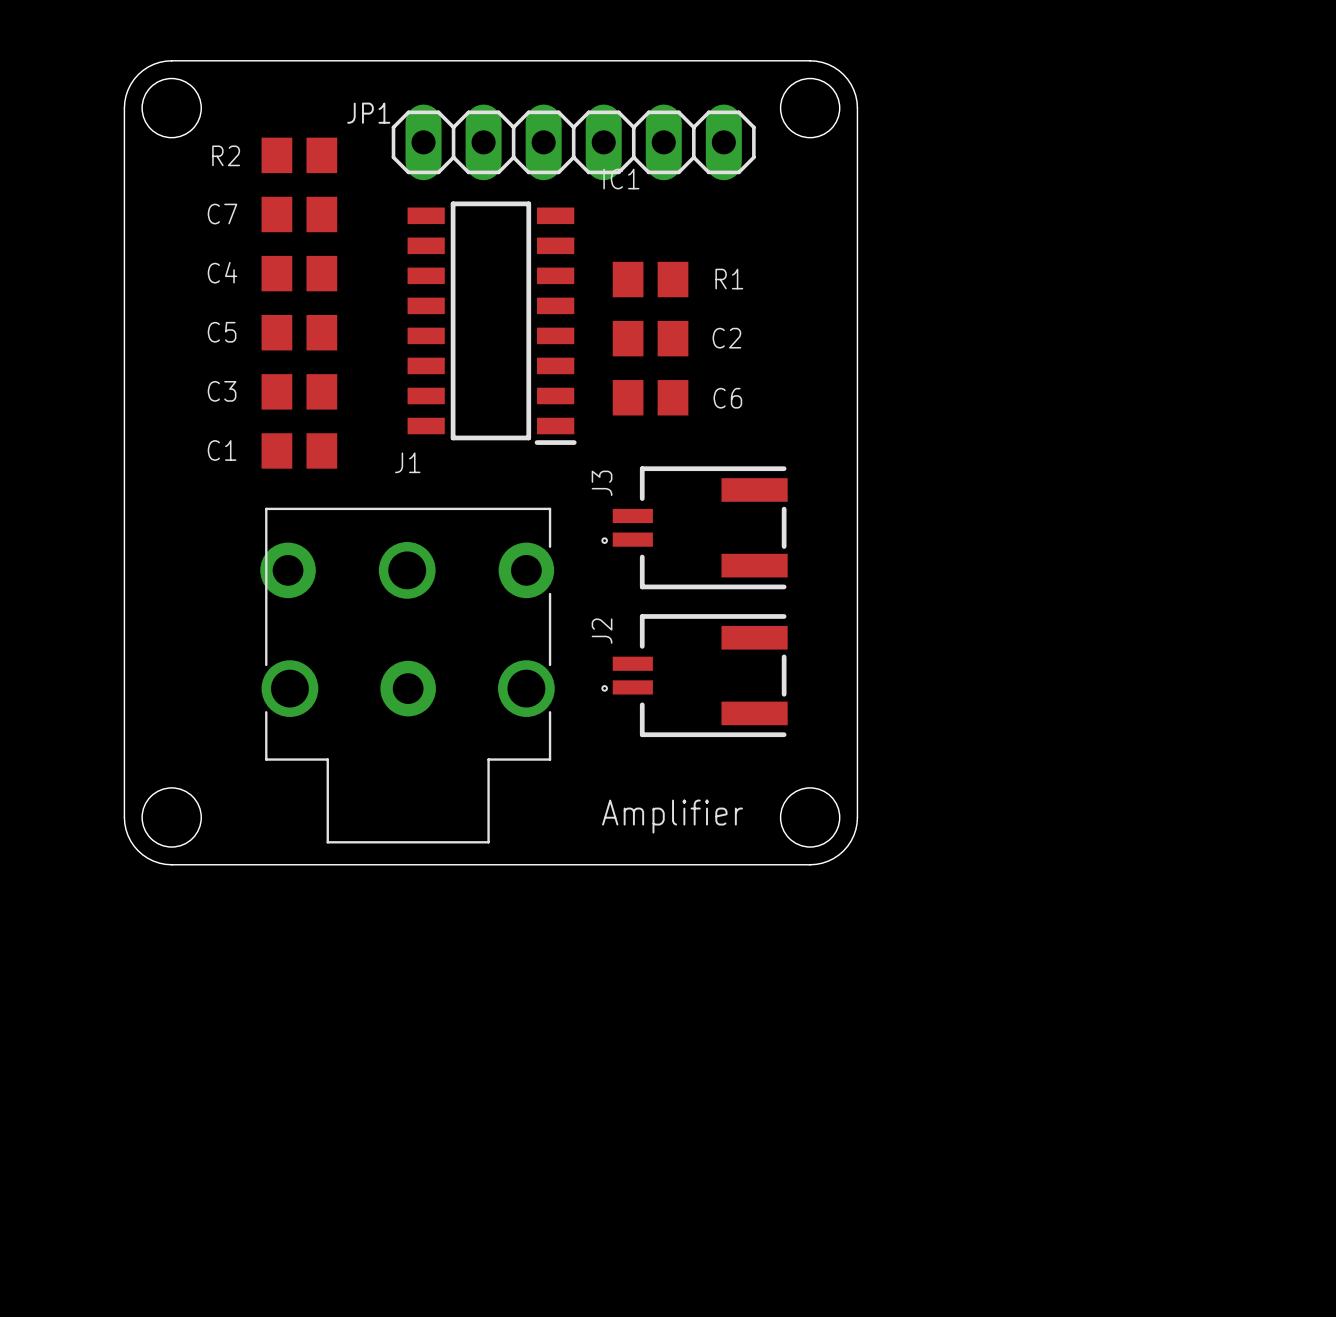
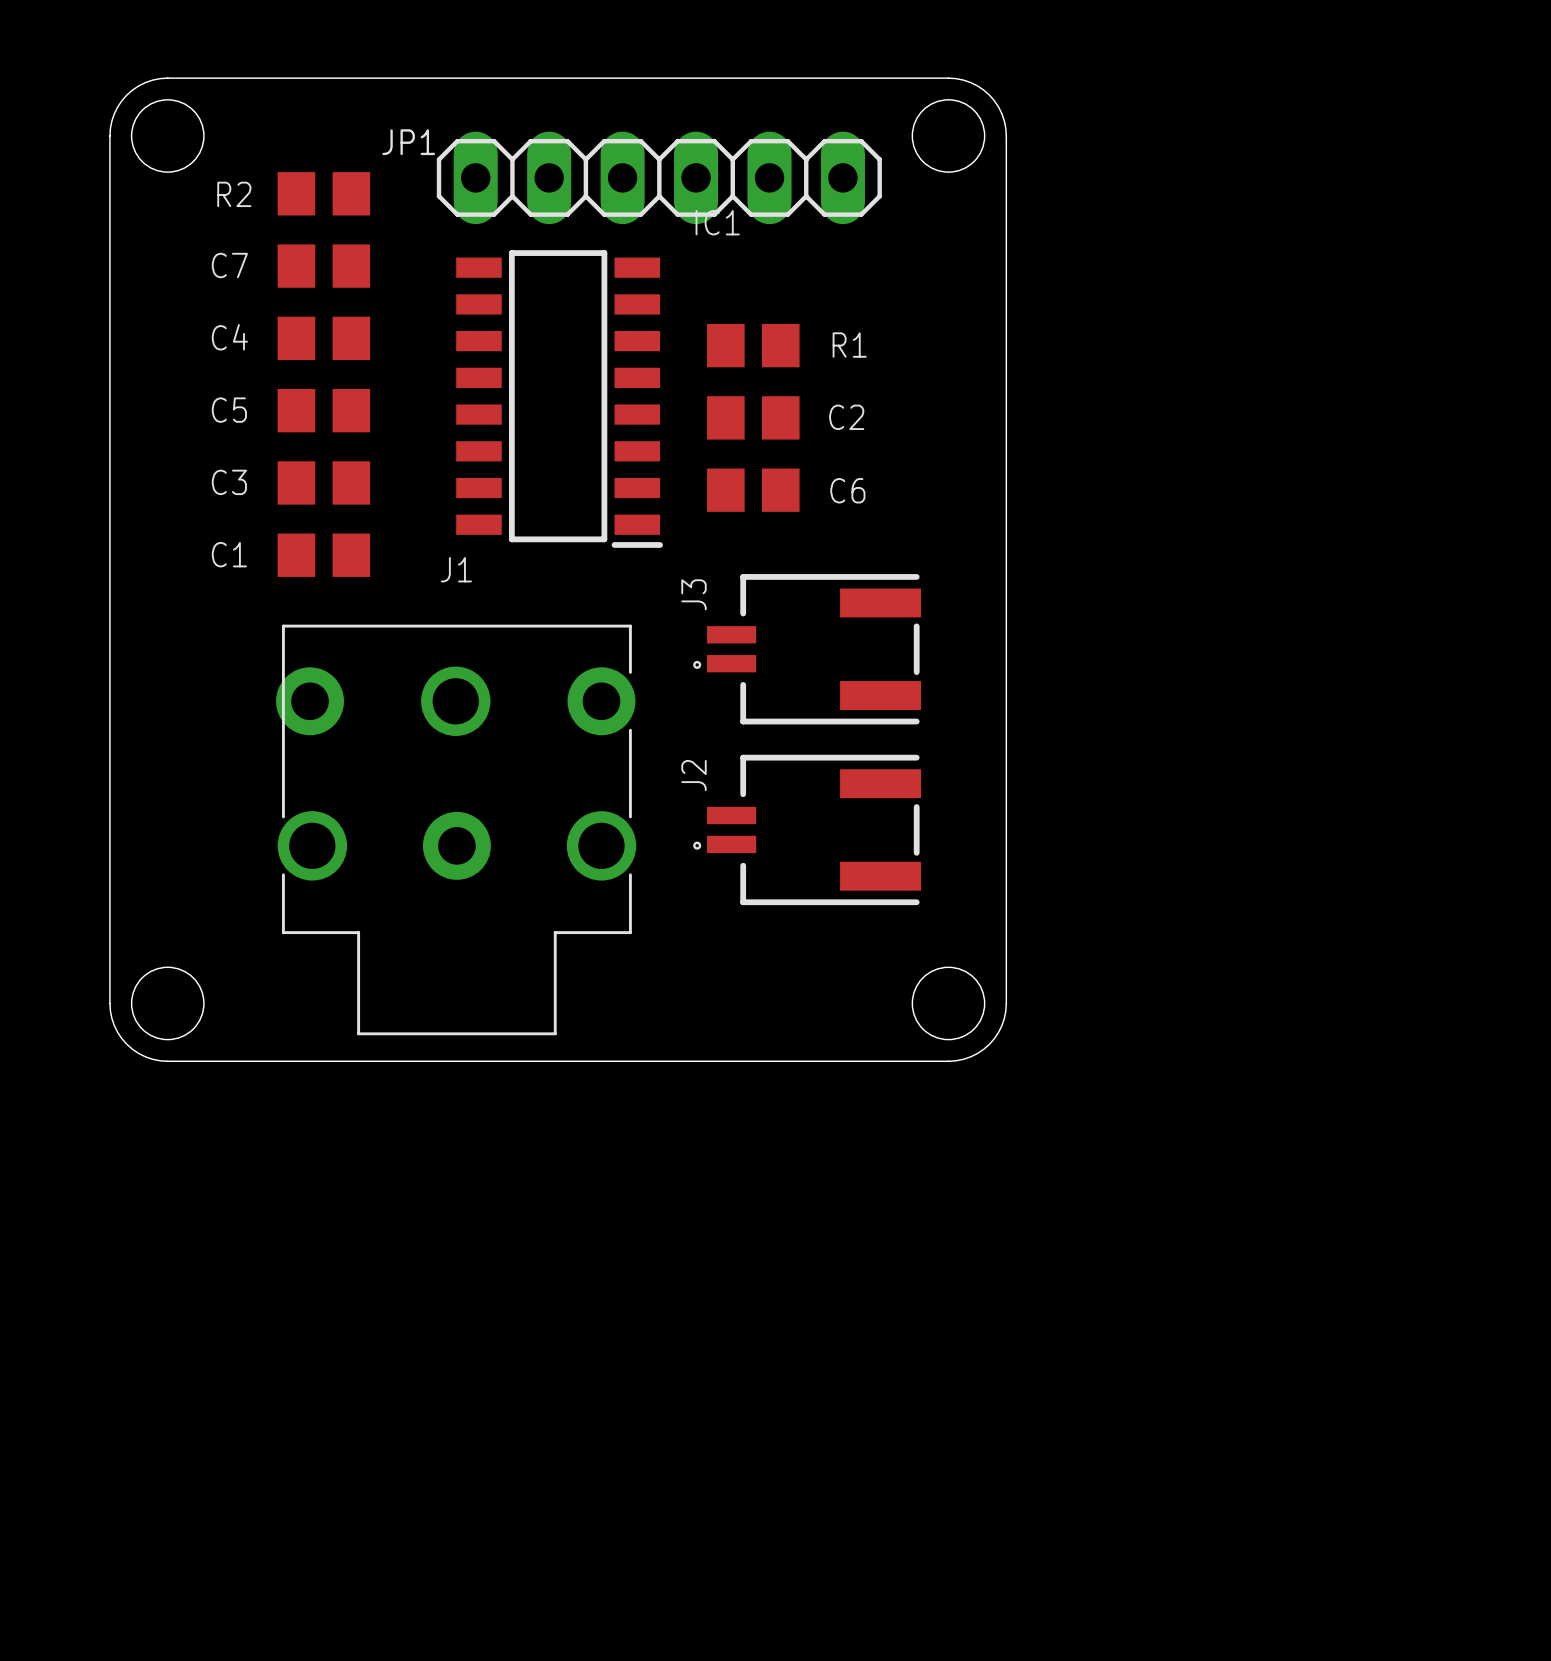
text: Amplifier (672, 816) -> none

